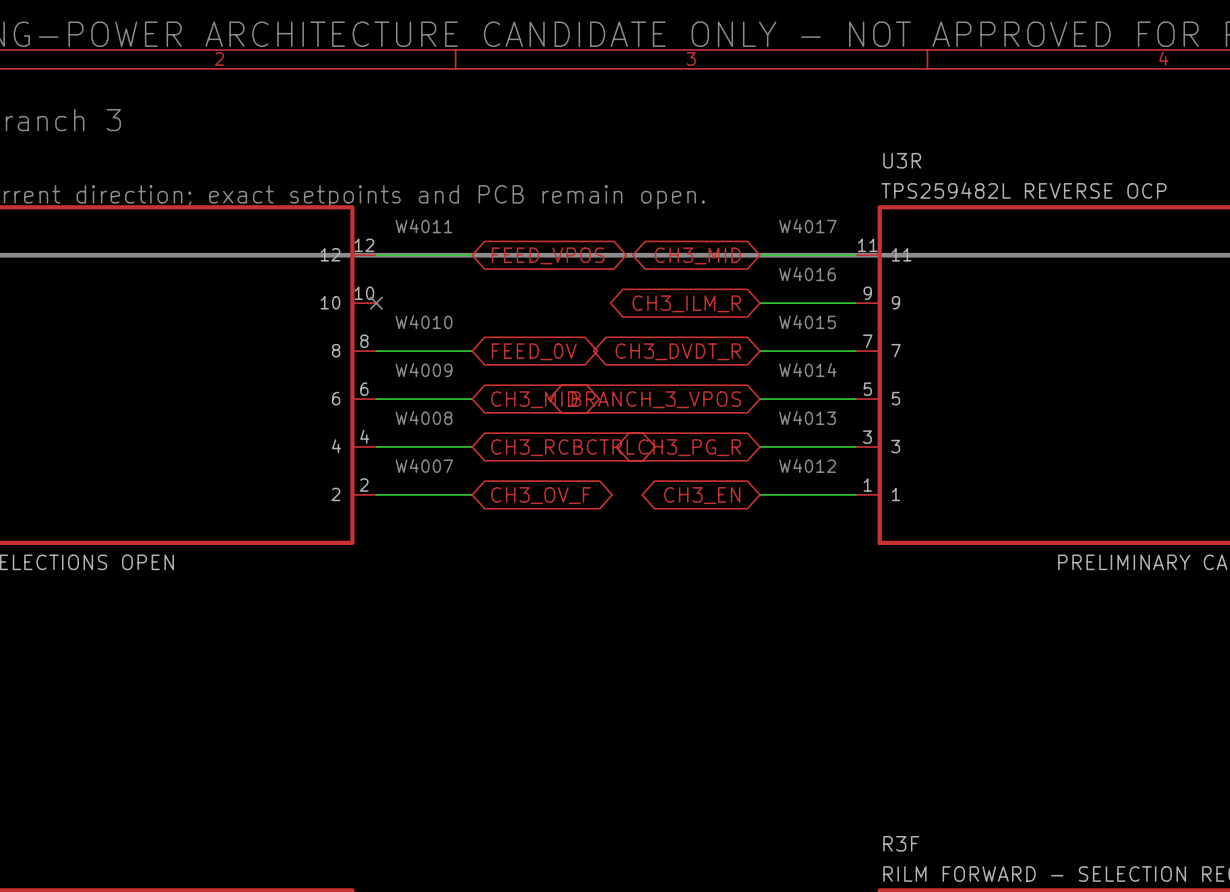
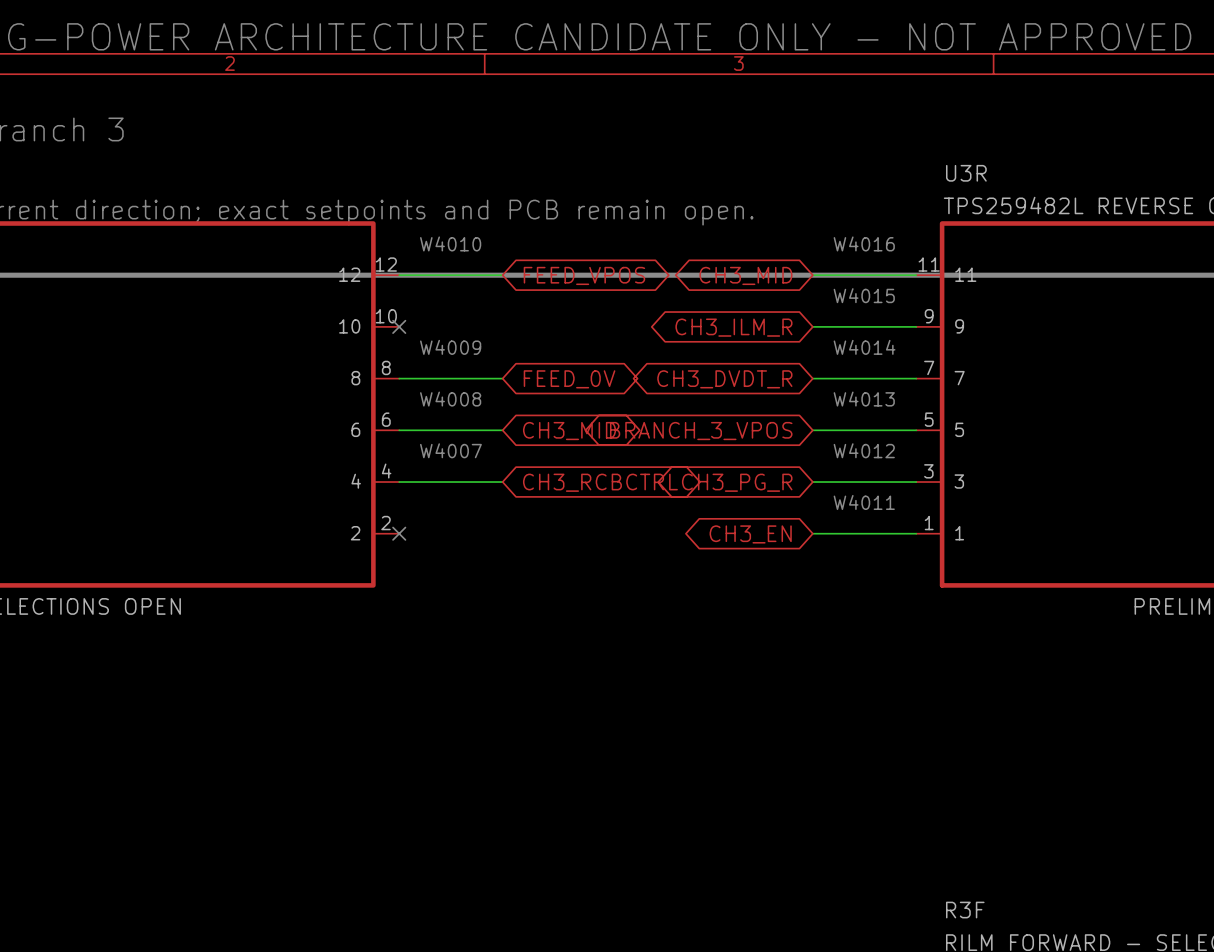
text: W4011 (424, 226) -> W4010 (450, 243)
text: W4017 (807, 226) -> W4016 (864, 243)
text: W4016 (807, 274) -> W4015 (864, 295)
text: W4010 (424, 322) -> W4009 (450, 347)
text: W4015 (807, 322) -> W4014 (864, 347)
text: W4009 (424, 370) -> W4008 (450, 399)
text: W4014 (807, 370) -> W4013 (864, 399)
text: W4008 (424, 418) -> W4007 (450, 450)
text: W4013 (807, 418) -> W4012 (864, 450)
text: W4007 (424, 465) -> none
text: W4012 (807, 465) -> W4011 (864, 502)
wire: (376, 494) (472, 494) -> none
no-connect mark: none -> (399, 533)
global label: CH3_OV_F (541, 495) -> none

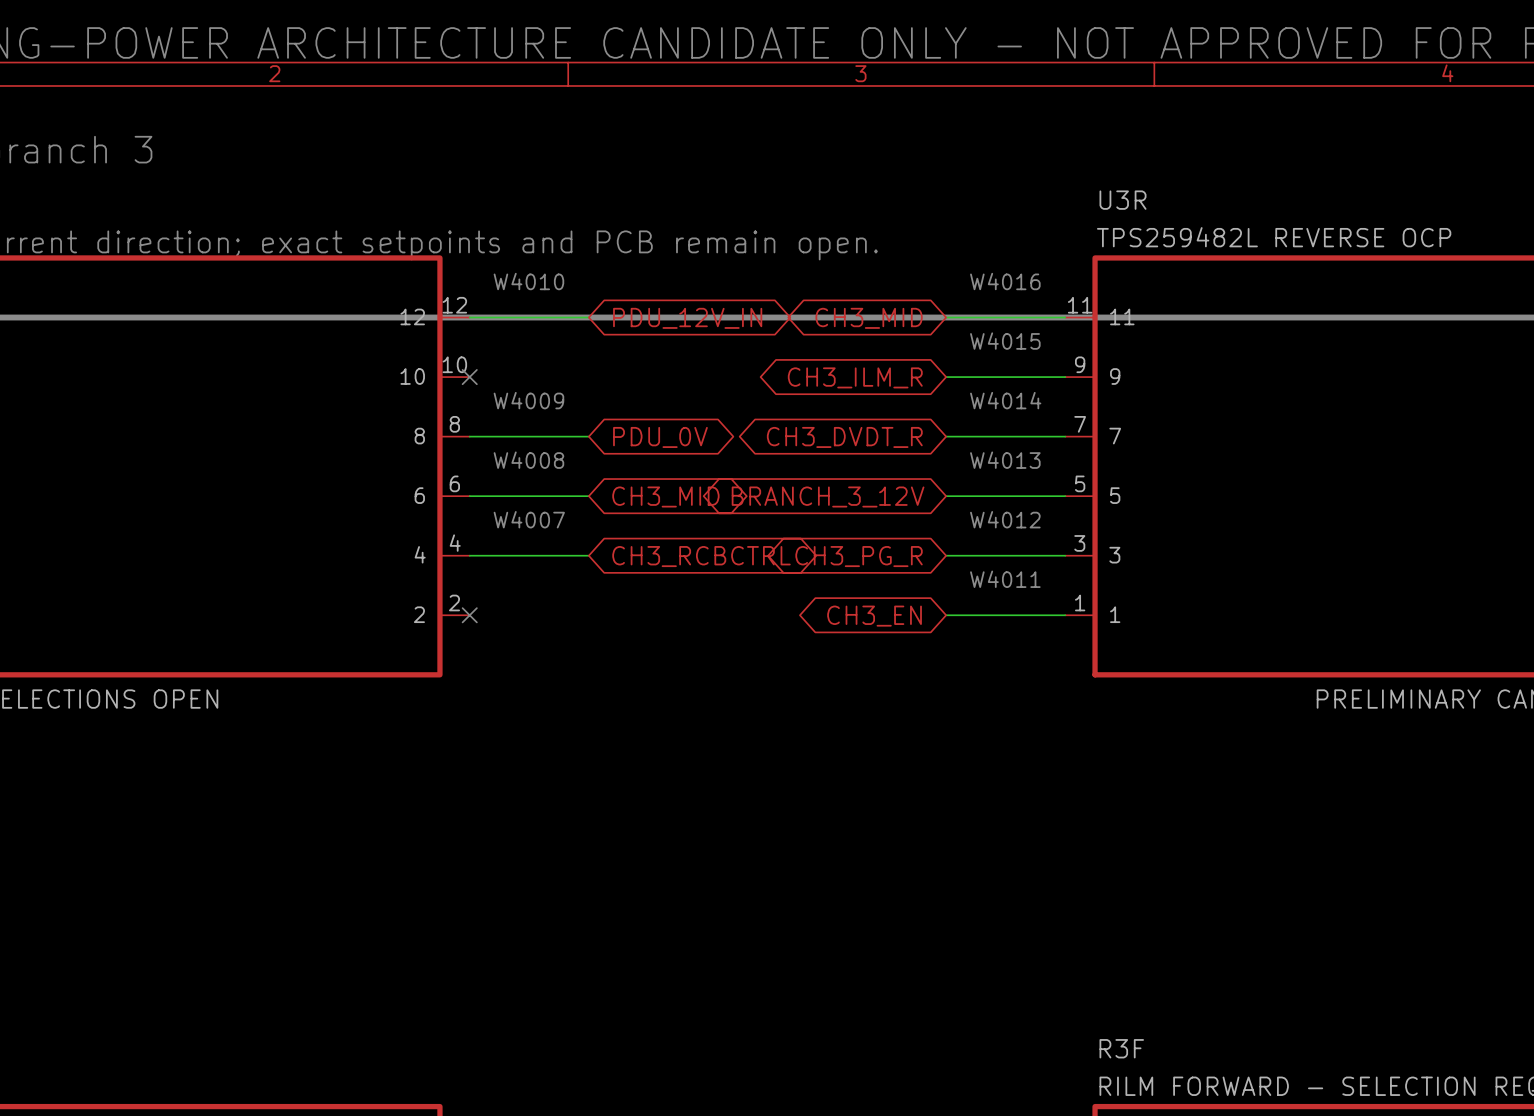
global label: FEED_VPOS (584, 275) -> PDU_12V_IN (687, 318)
global label: FEED_0V (569, 379) -> PDU_0V (660, 437)
global label: BRANCH_3_VPOS (701, 431) -> BRANCH_3_12V (828, 497)

